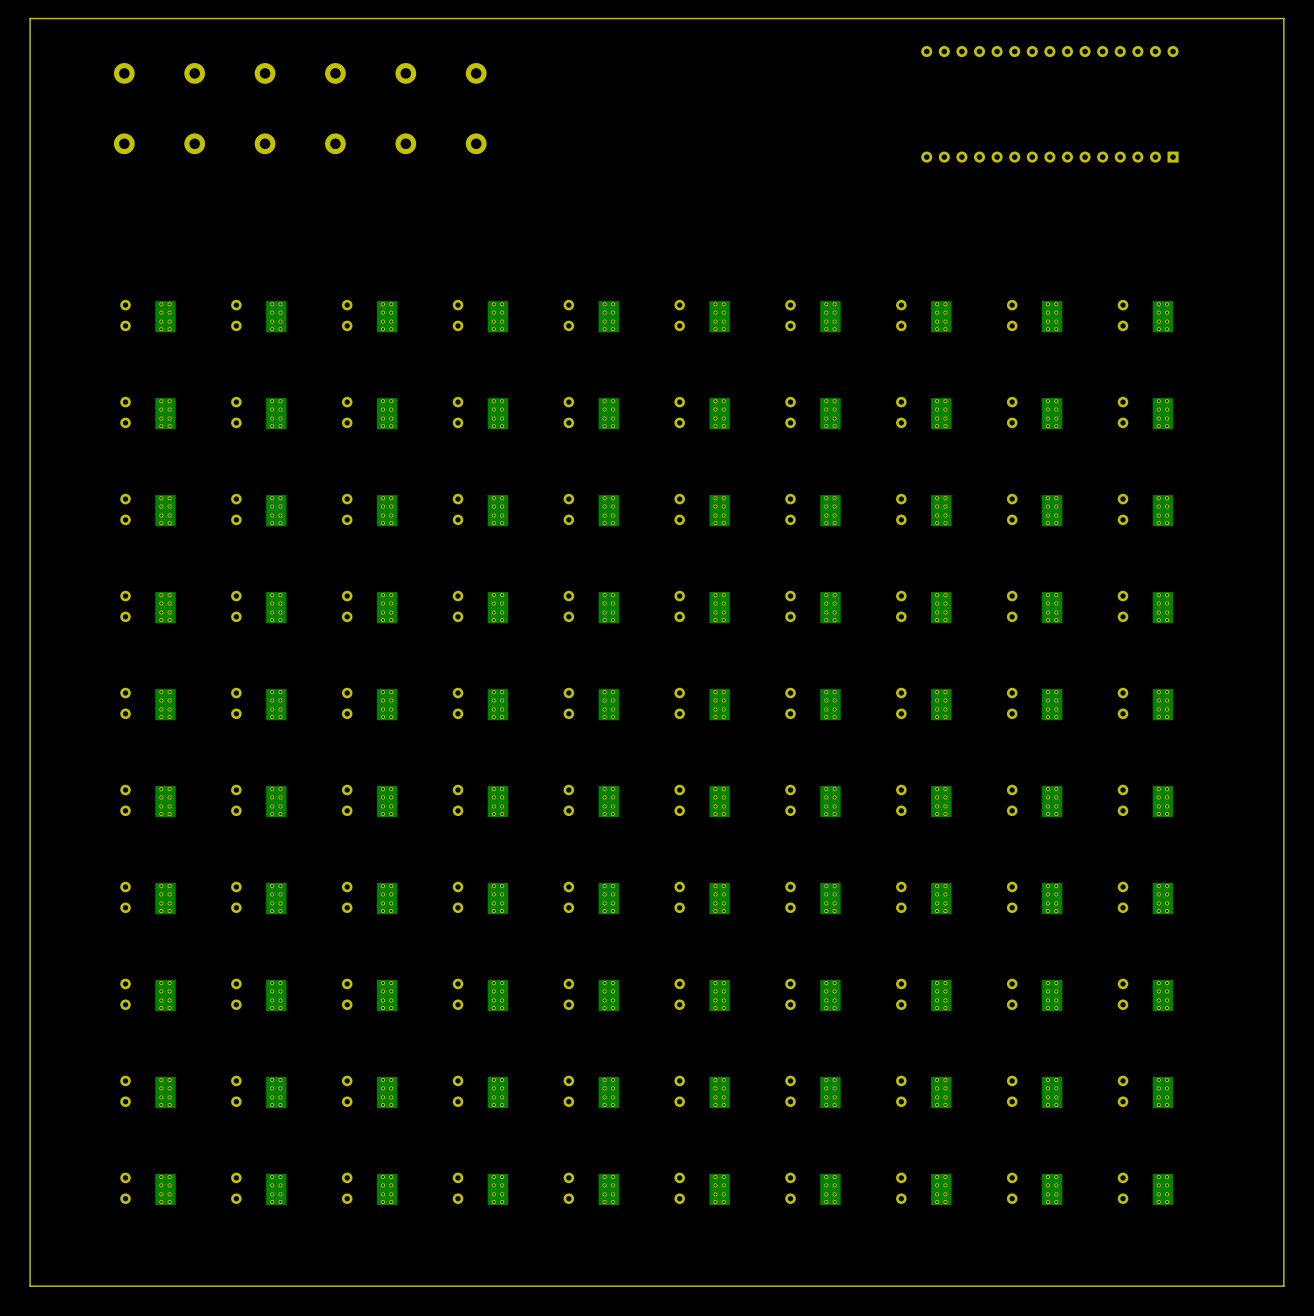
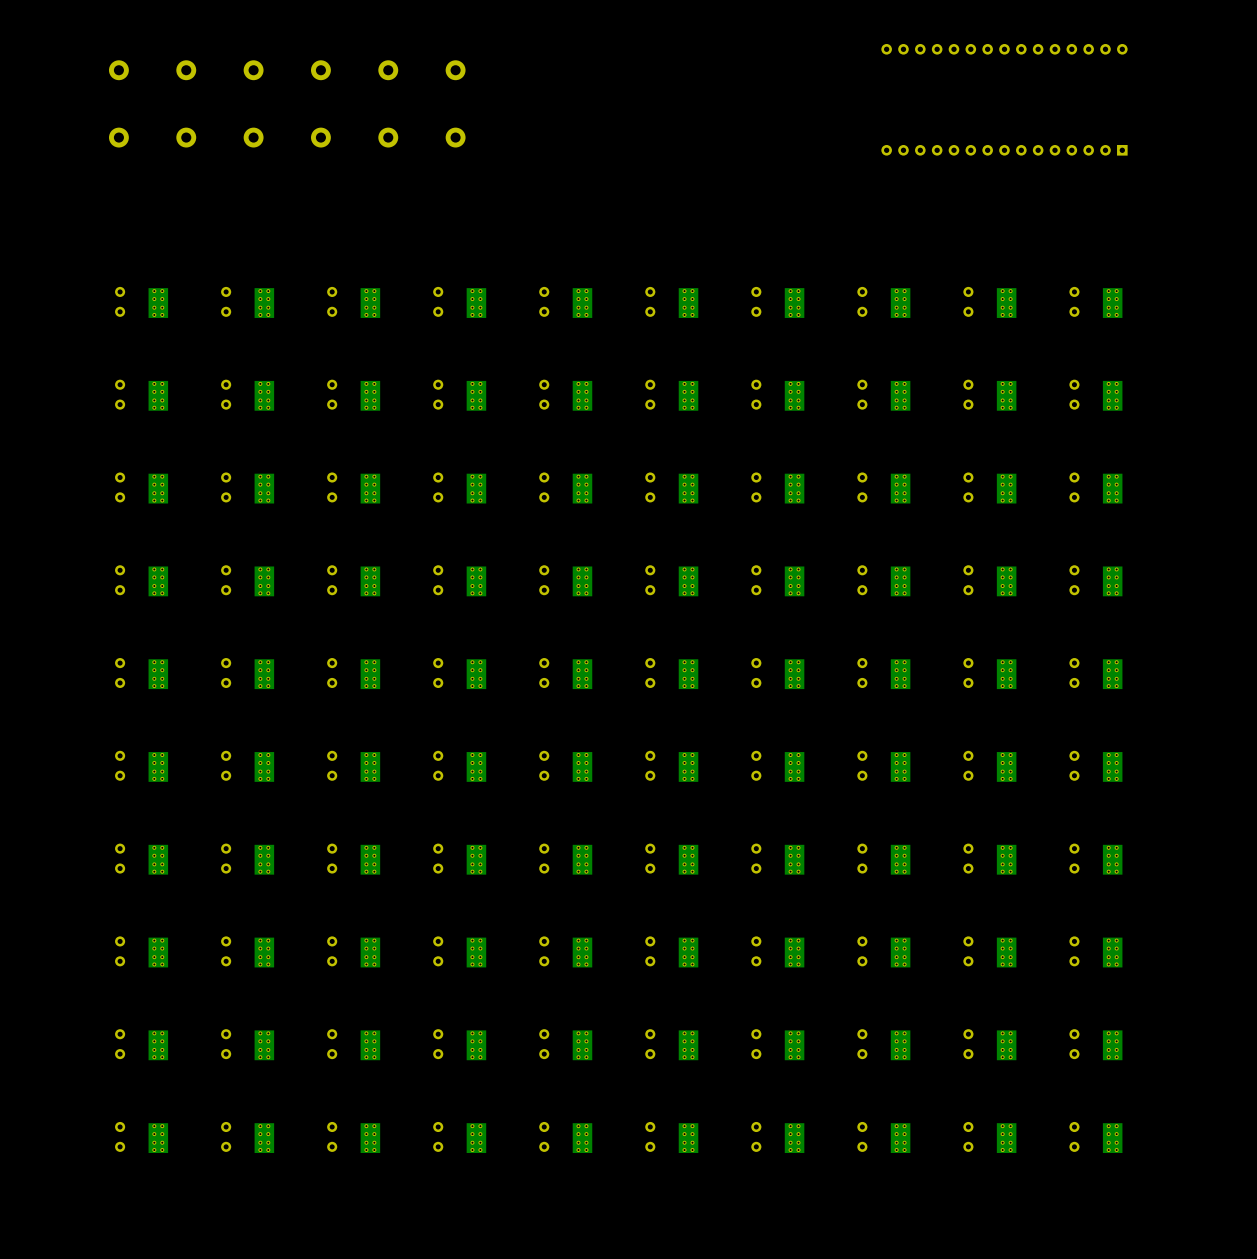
board edge: (1283, 18) (1283, 1286) (30, 1286) (30, 18) (1283, 18) -> none

